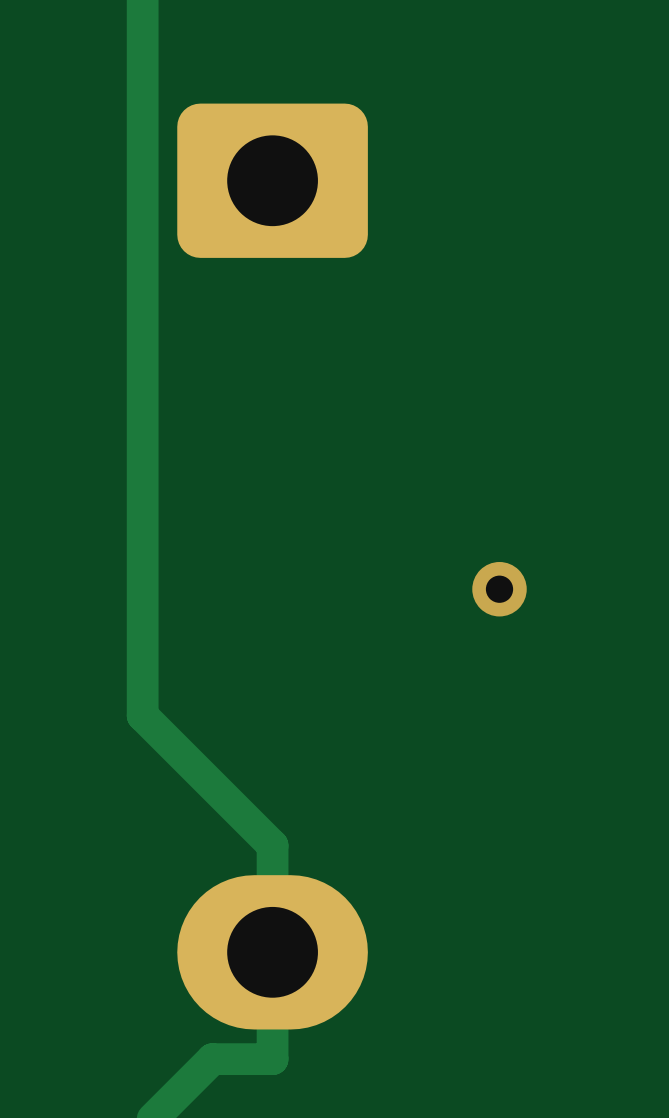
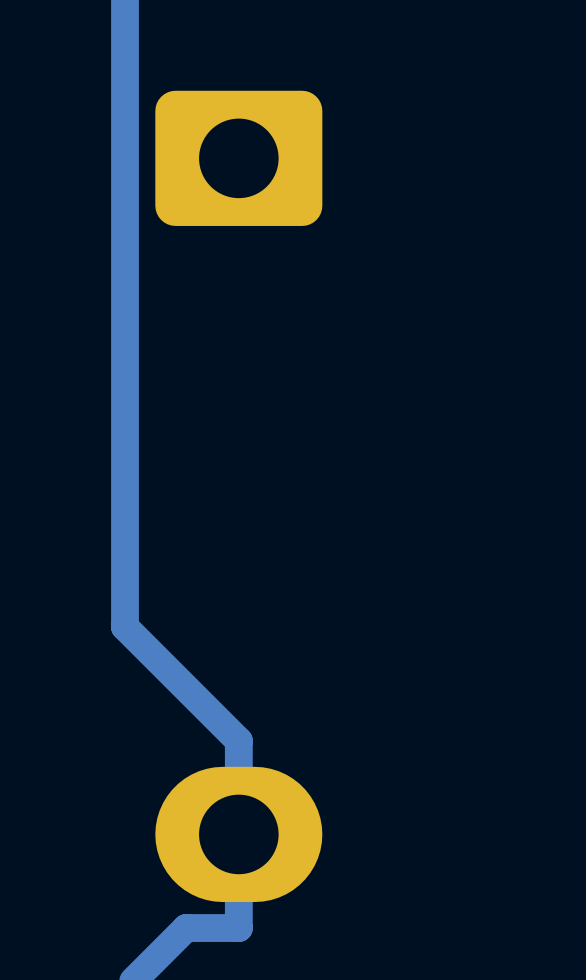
via: (499, 589) -> none

